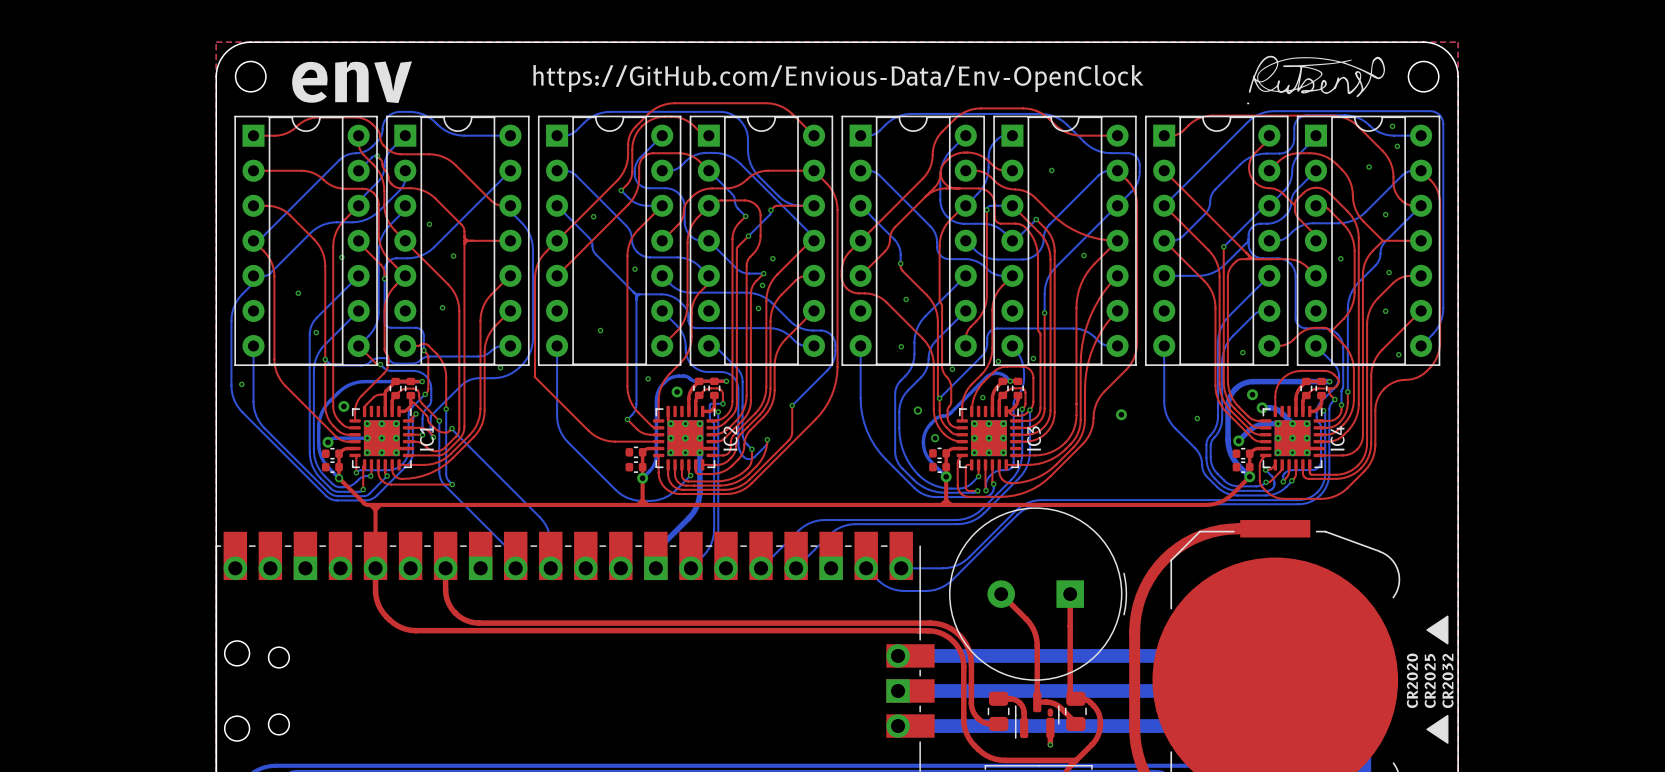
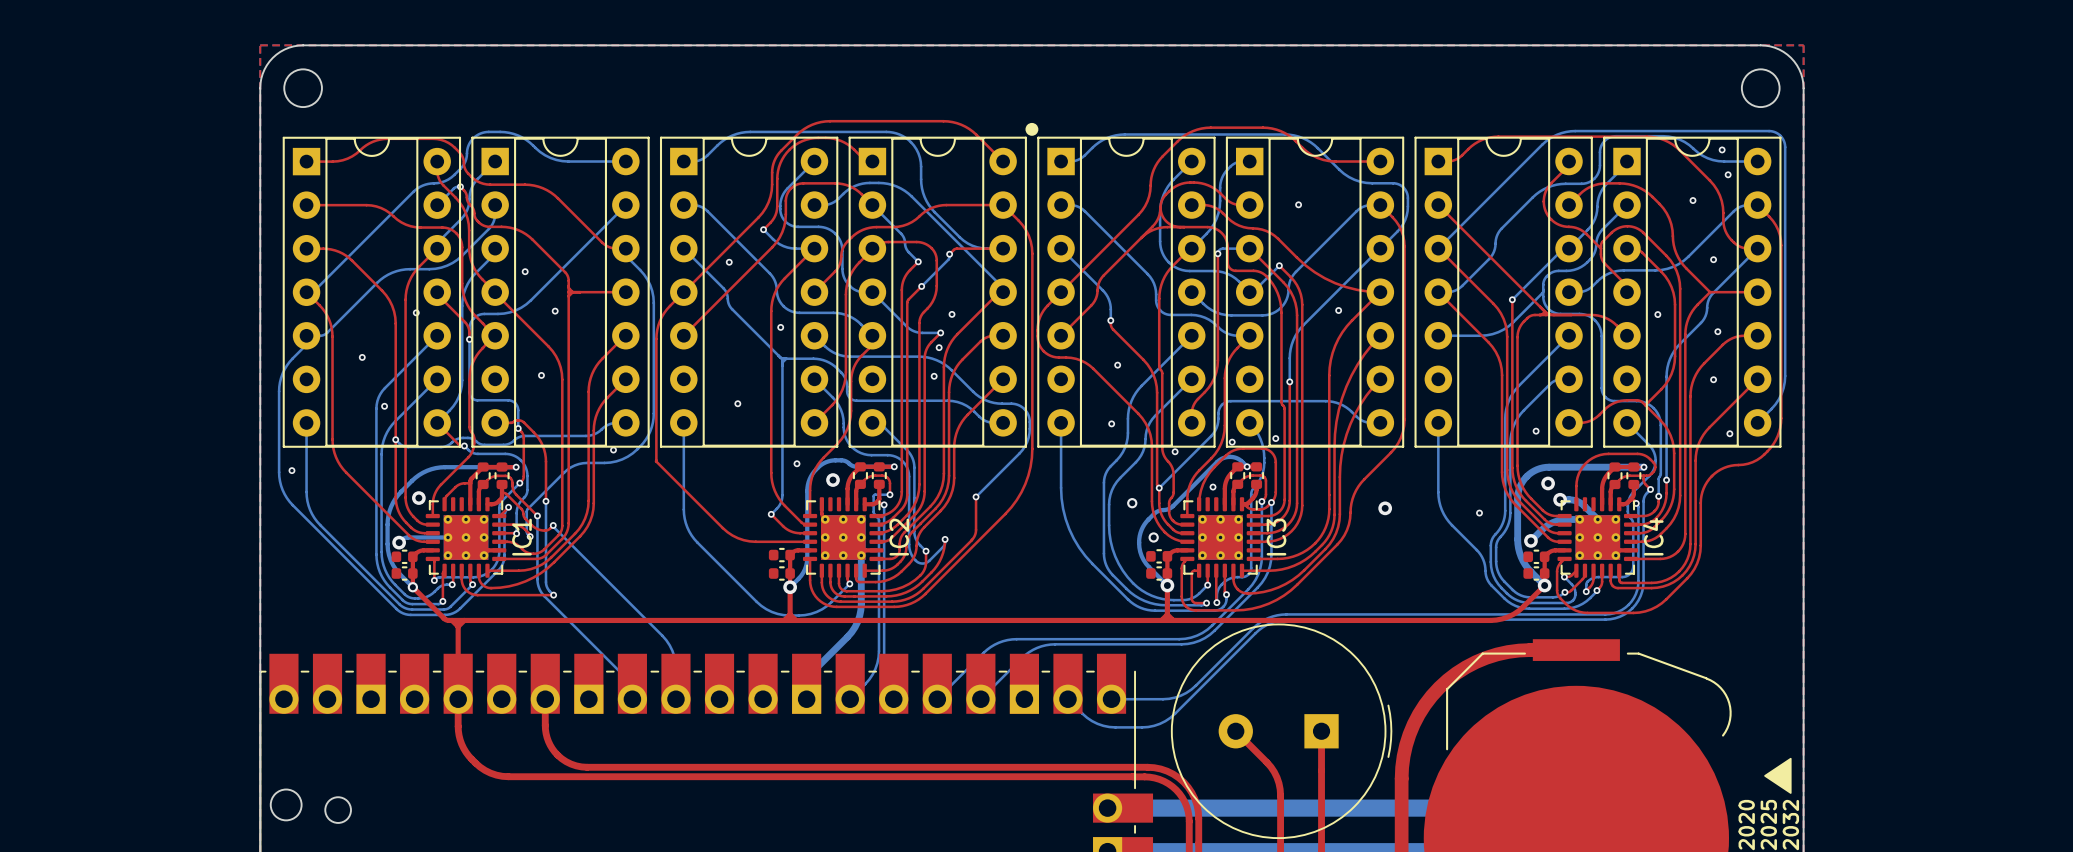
drawing: [1247, 55, 1386, 105] -> none
text: https://GitHub.com/Envious-Data/Env-OpenClock (838, 78) -> none
text: env (352, 82) -> none
drawing: none -> [1025, 122, 1039, 136]

